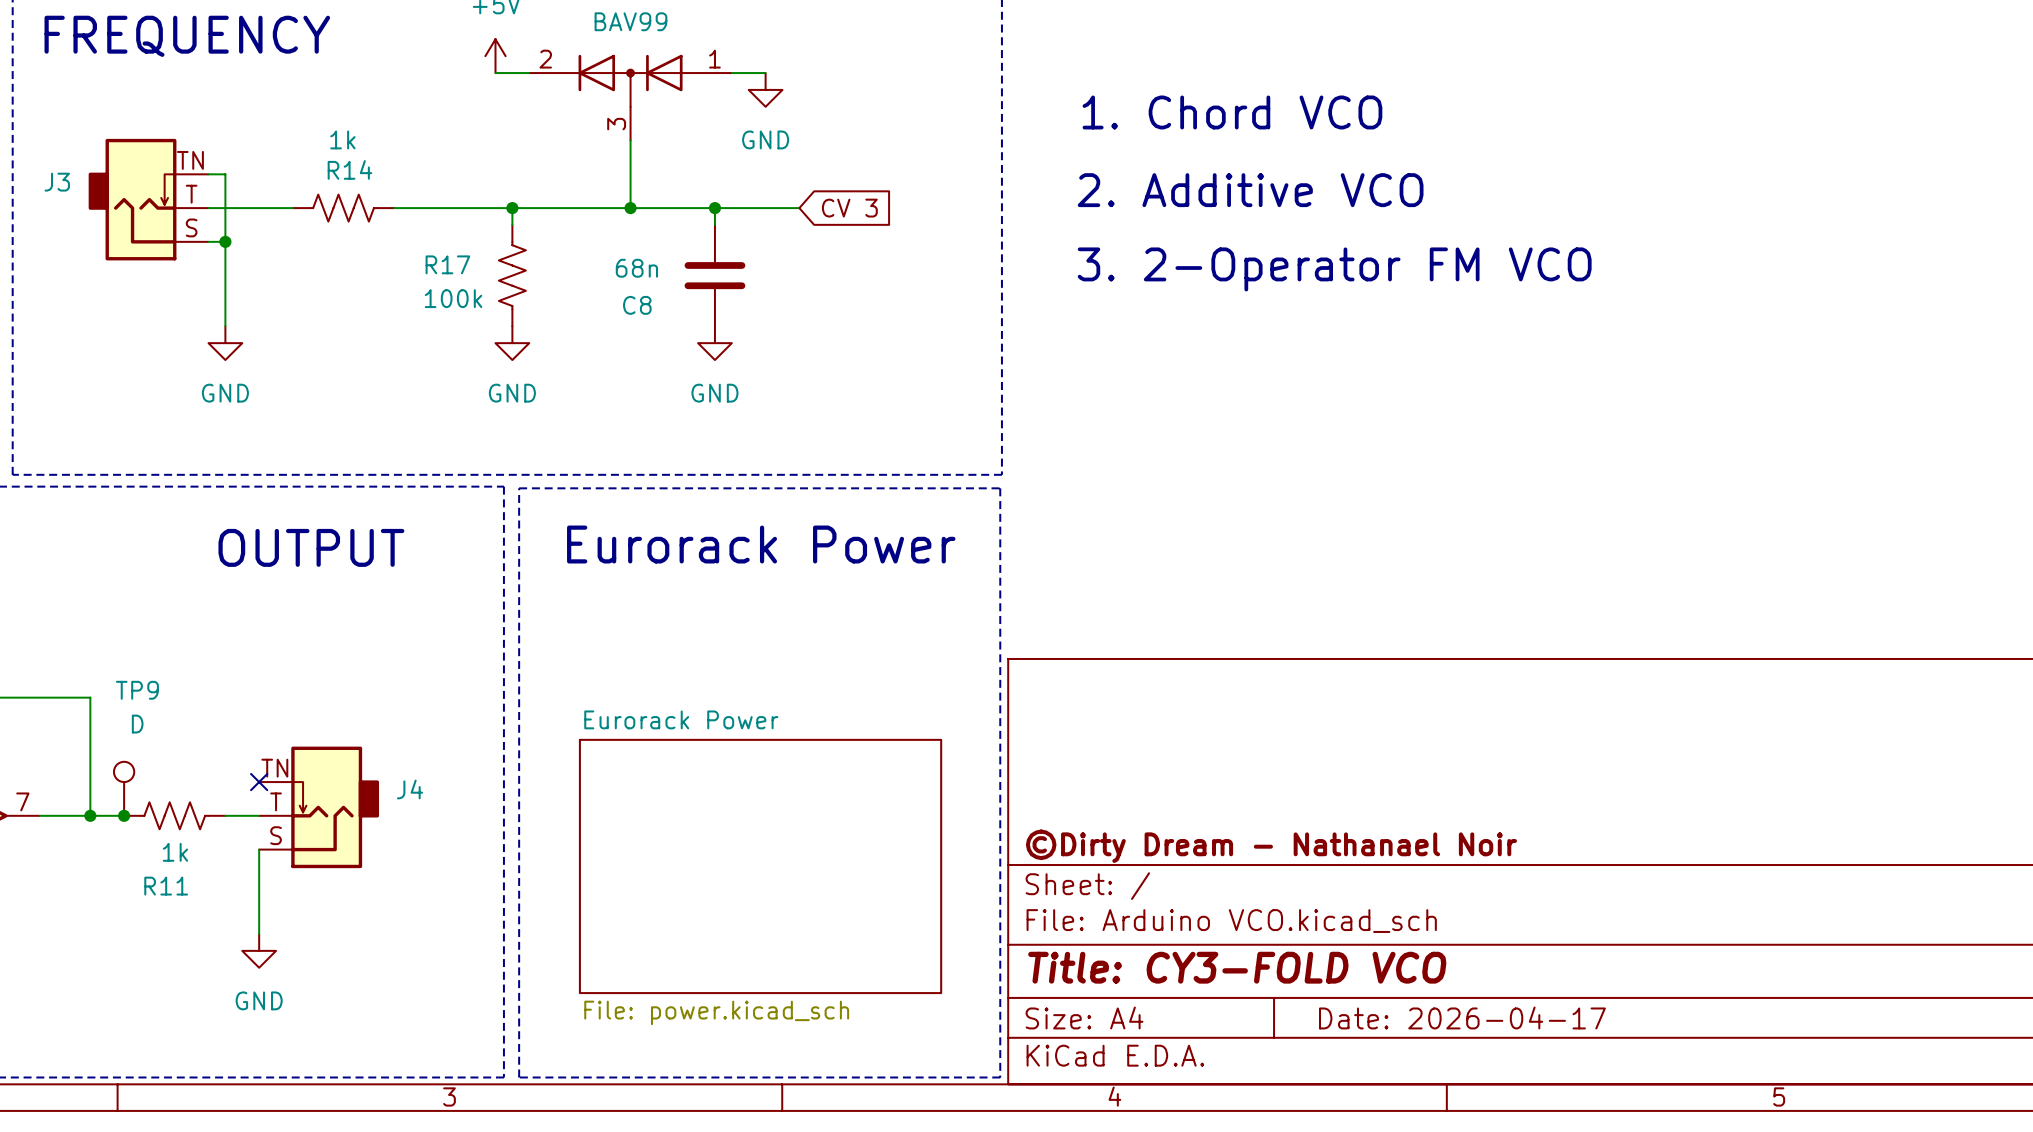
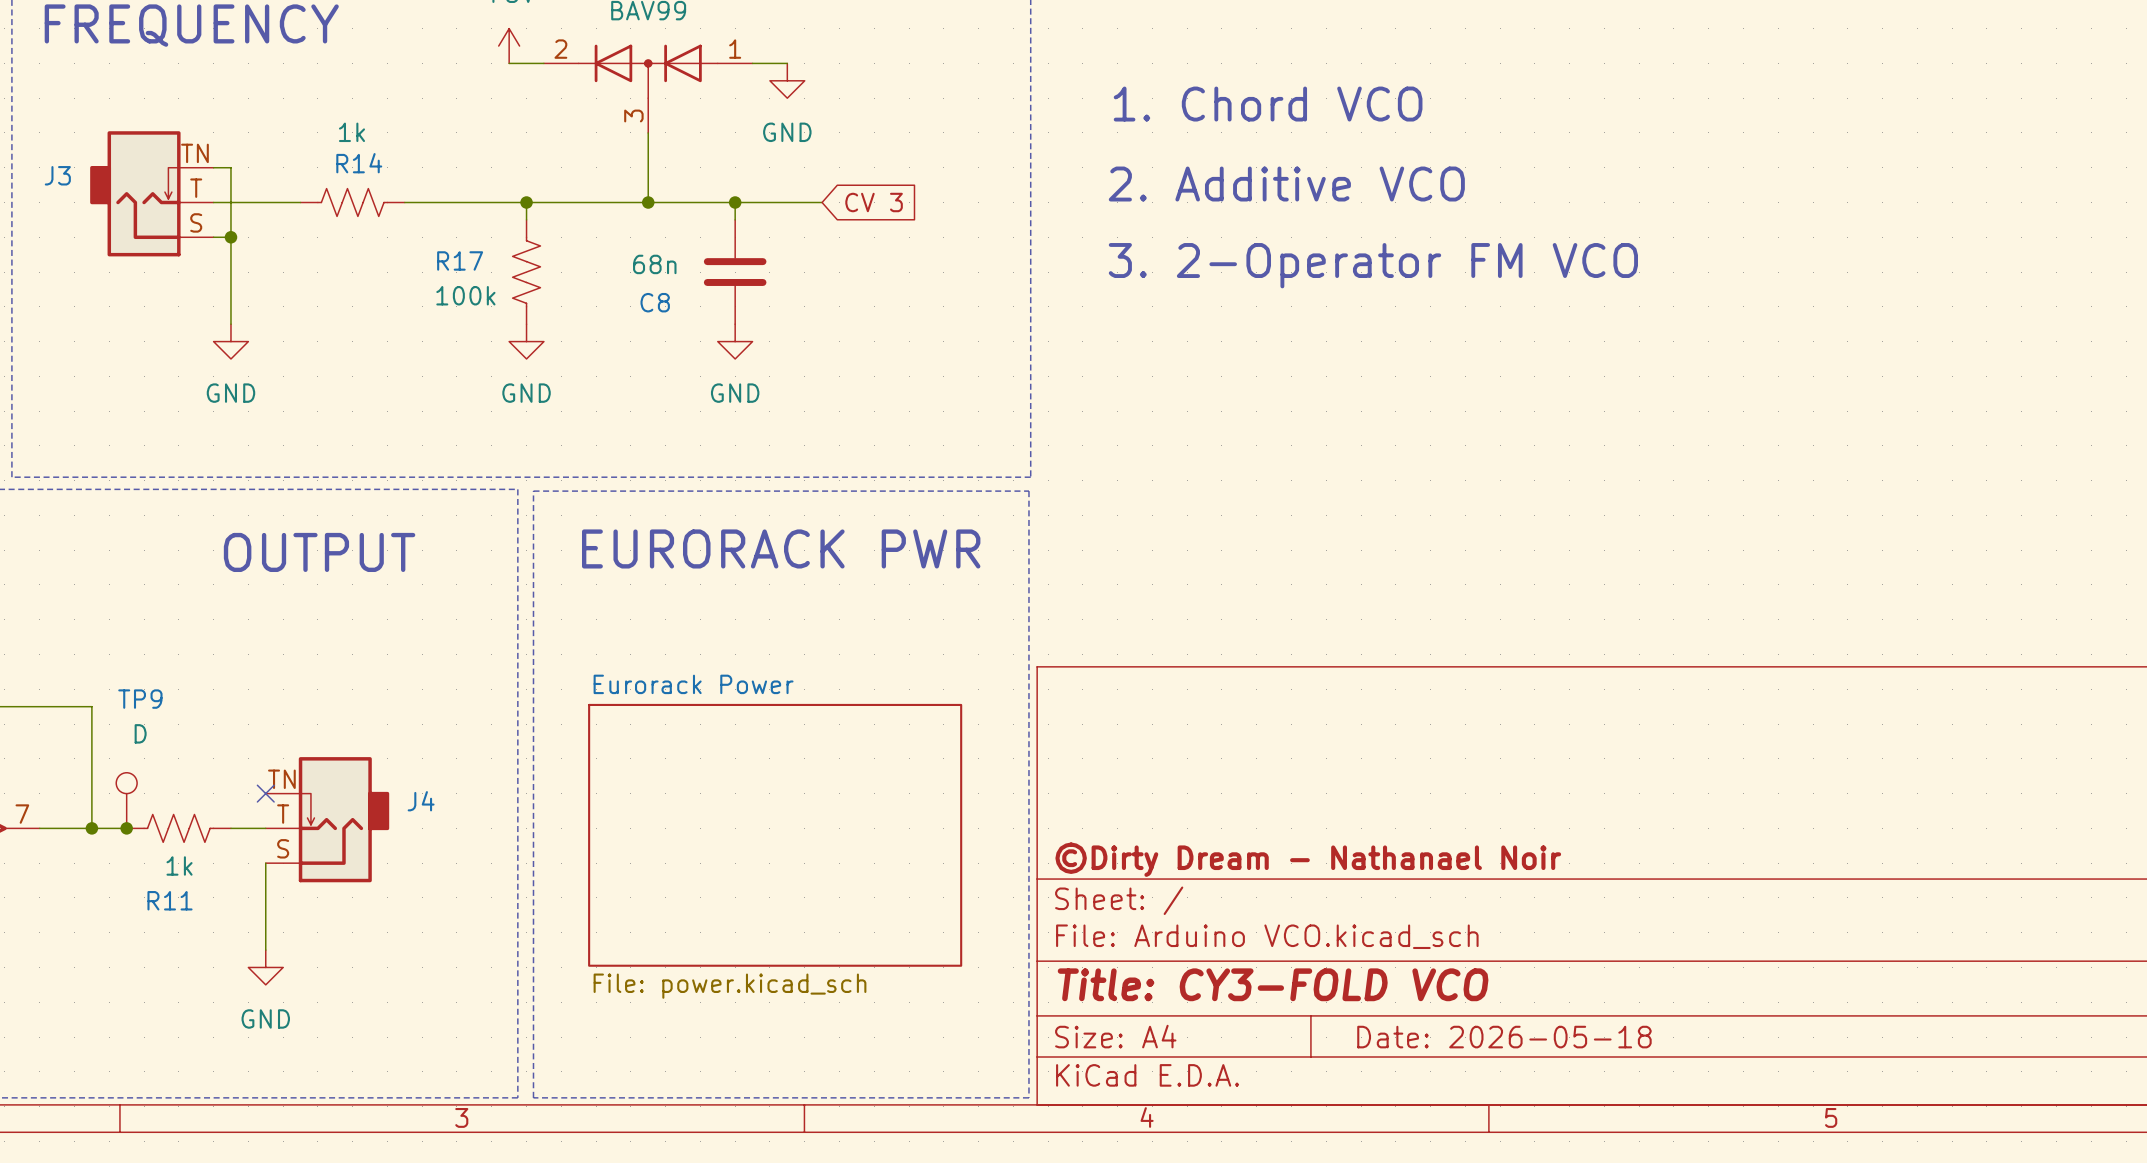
text: Eurorack Power (761, 544) -> EURORACK PWR (781, 548)
sheet Eurorack Power position: (760, 866) -> (775, 835)
title block: Date: 2026-04-17 (1462, 1017) -> Date: 2026-05-18 (1504, 1037)

